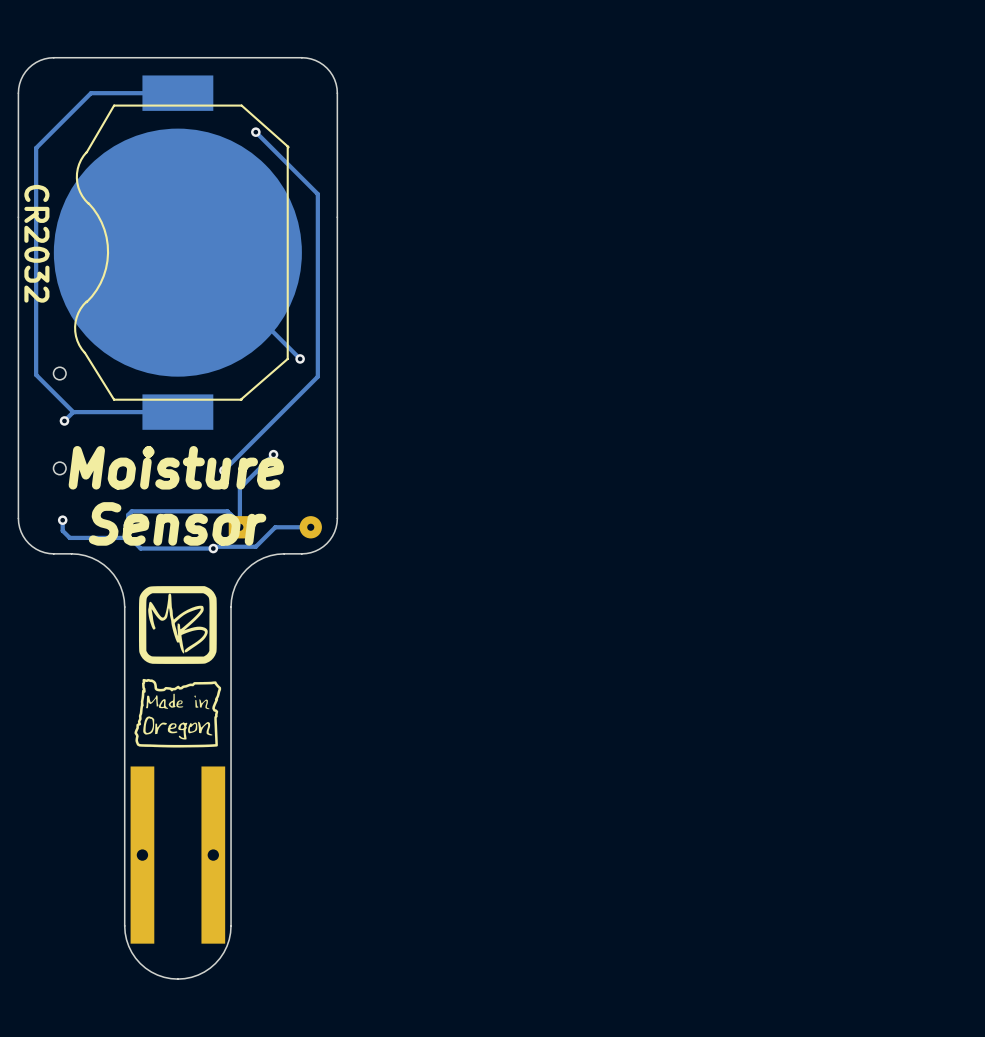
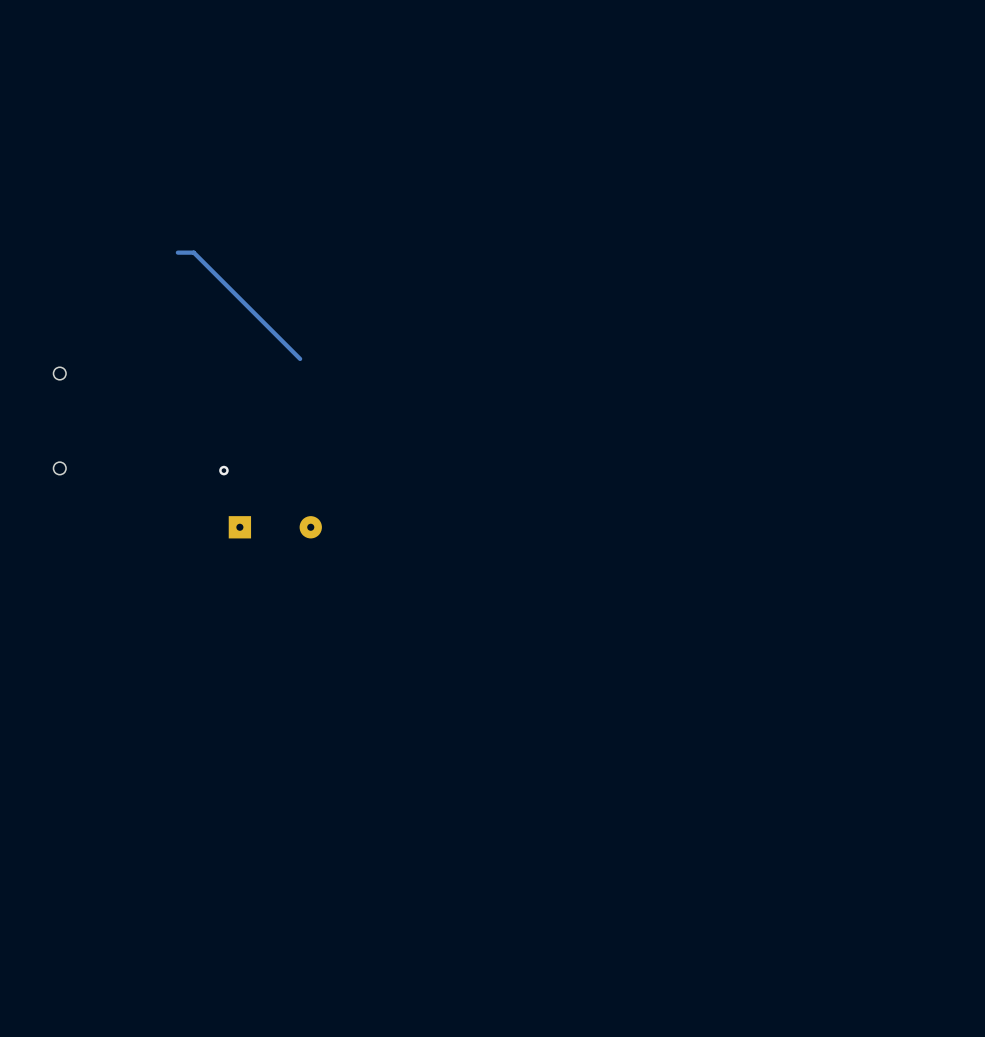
board edge: (301, 57) (49, 58) (36, 62) (28, 68) (23, 75) (18, 88) (18, 523) (25, 539) (40, 551) (85, 555) (103, 564) (117, 580) (122, 593) (124, 607) (125, 932) (131, 952) (140, 963) (157, 975) (170, 978) (191, 977) (210, 968) (223, 952) (230, 932) (231, 607) (235, 586) (246, 569) (263, 557) (277, 554) (306, 553) (319, 549) (330, 539) (337, 523) (337, 88) (332, 75) (323, 65) (315, 60) (301, 57) -> none
track: (177, 93) (91, 93) (36, 148) (36, 374) (73, 412) -> none
track: (255, 132) (317, 194) (317, 376) (223, 470) -> none
via: (255, 132) -> none
text: CR2032 (36, 243) -> none
part: (177, 252) -> none
via: (300, 358) -> none
track: (73, 412) (64, 420) -> none
track: (177, 412) (73, 412) -> none
via: (64, 420) -> none
track: (273, 454) (239, 488) (239, 527) (241, 527) -> none
via: (273, 454) -> none
text: Moisture (176, 467) -> none
track: (62, 520) (62, 530) (69, 537) (130, 537) (140, 548) (255, 546) (275, 527) (310, 527) -> none
via: (62, 520) -> none
text: Sensor (177, 523) -> none
track: (239, 523) (227, 511) (131, 511) (128, 514) (128, 525) -> none
via: (213, 548) -> none
drawing: [134, 586, 222, 748] -> none
part: (142, 855) -> none
part: (213, 855) -> none

